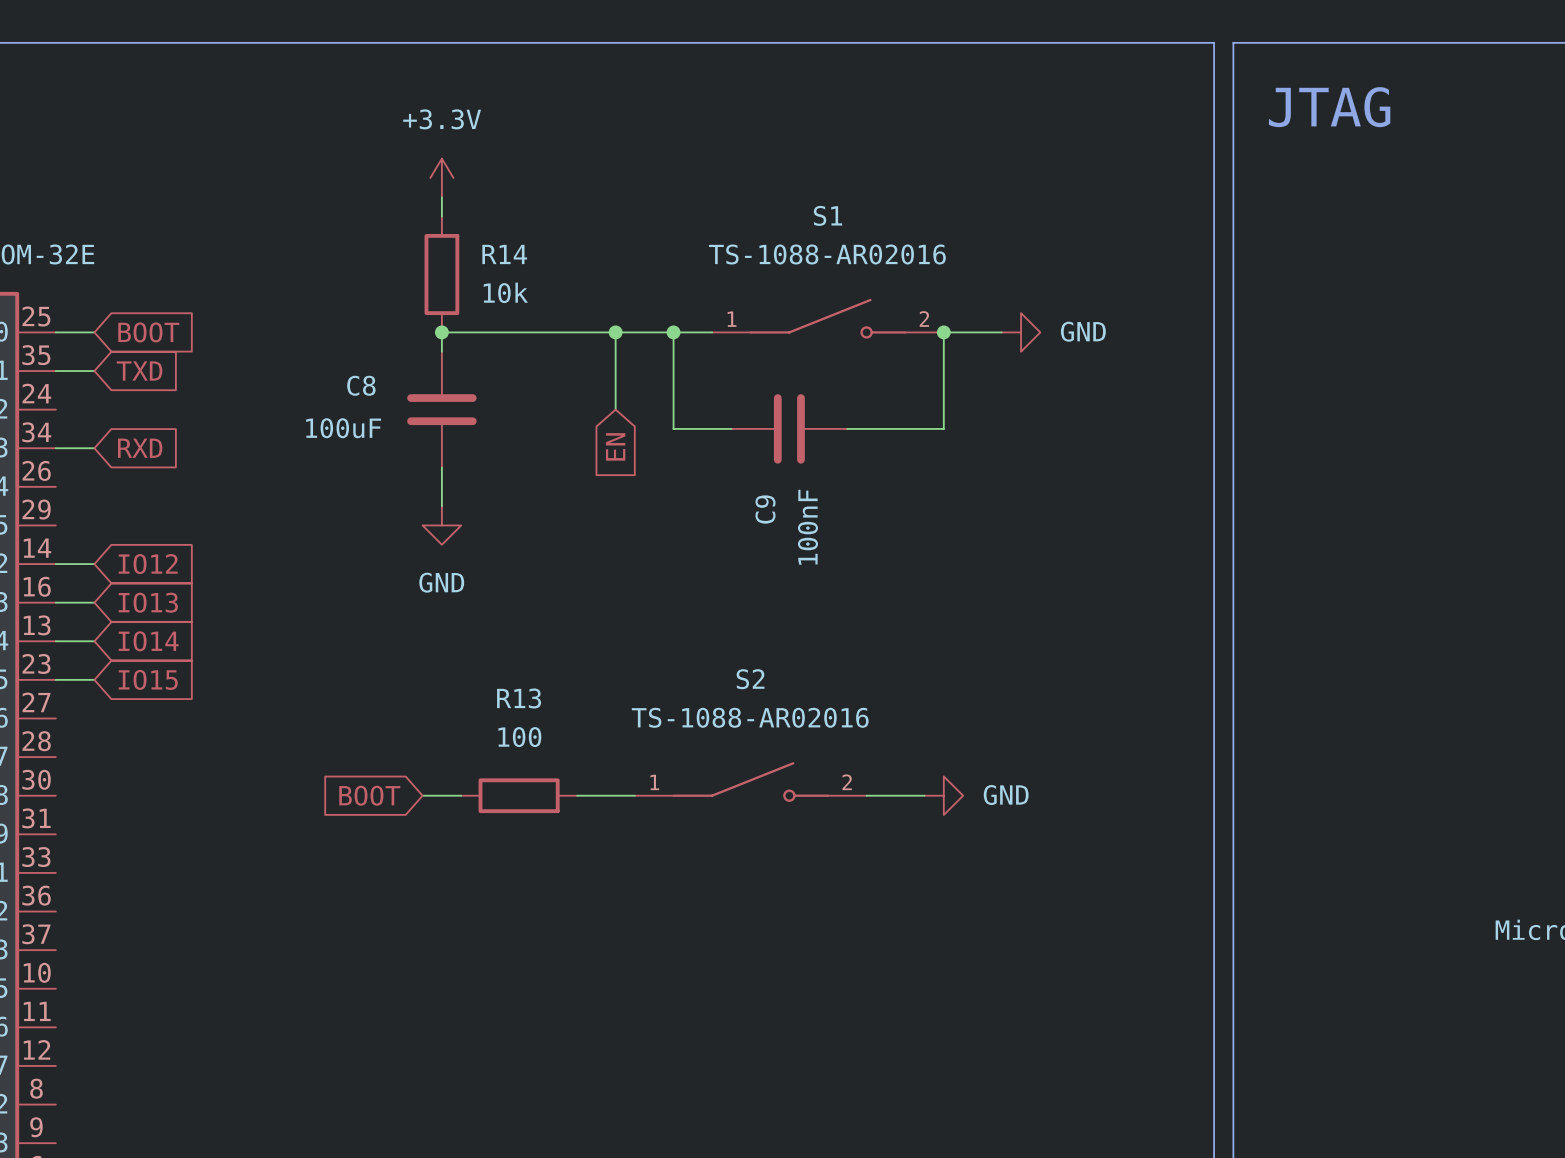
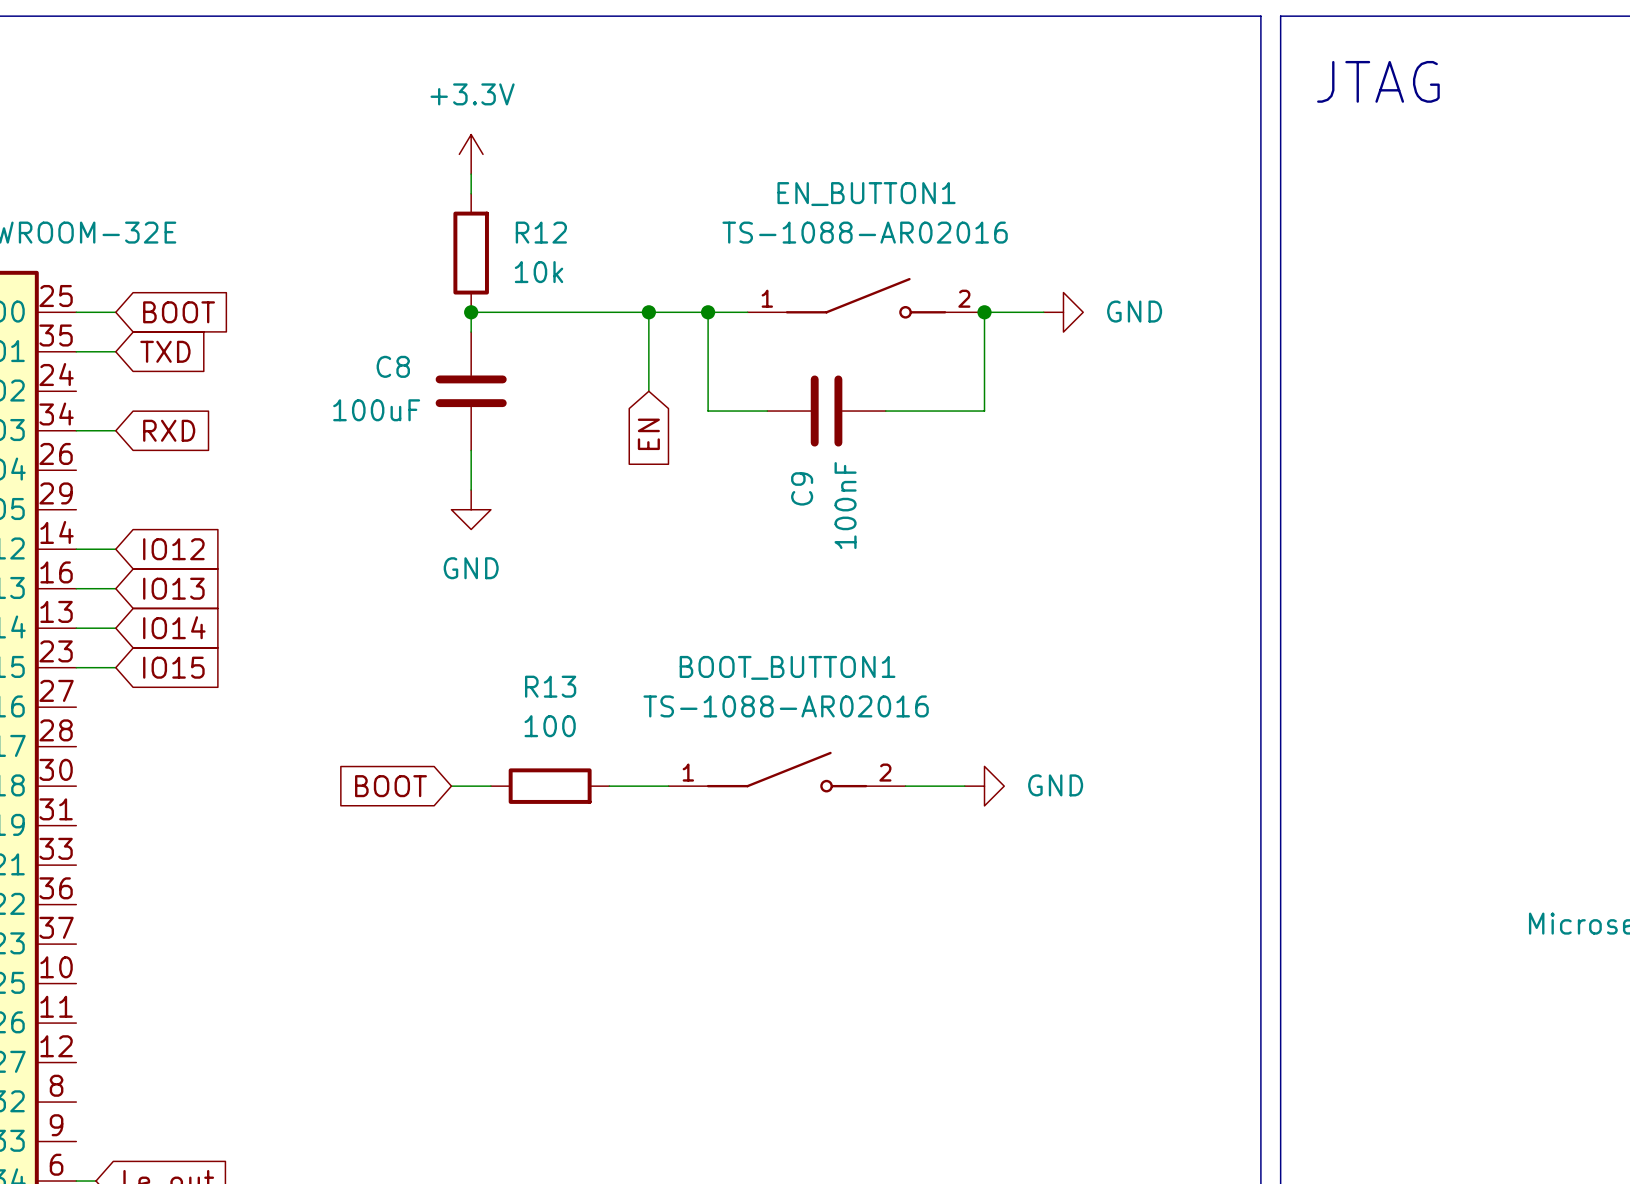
S1 name: S1 (827, 215) -> EN_BUTTON1 (866, 194)
R14 name: R14 (504, 254) -> R12 (541, 232)
S2 name: S2 (750, 679) -> BOOT_BUTTON1 (787, 667)

